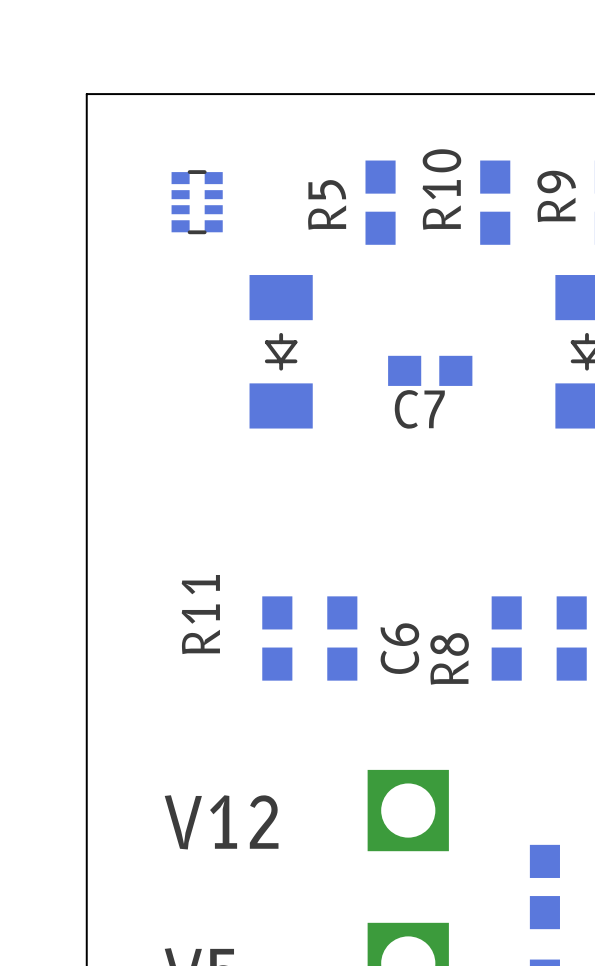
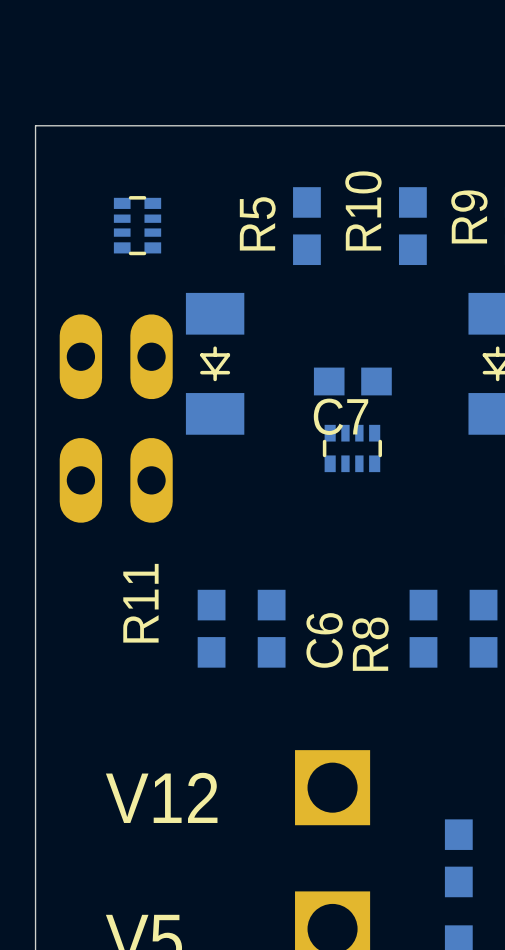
part: none -> (116, 356)
part: none -> (352, 448)
part: none -> (116, 480)

